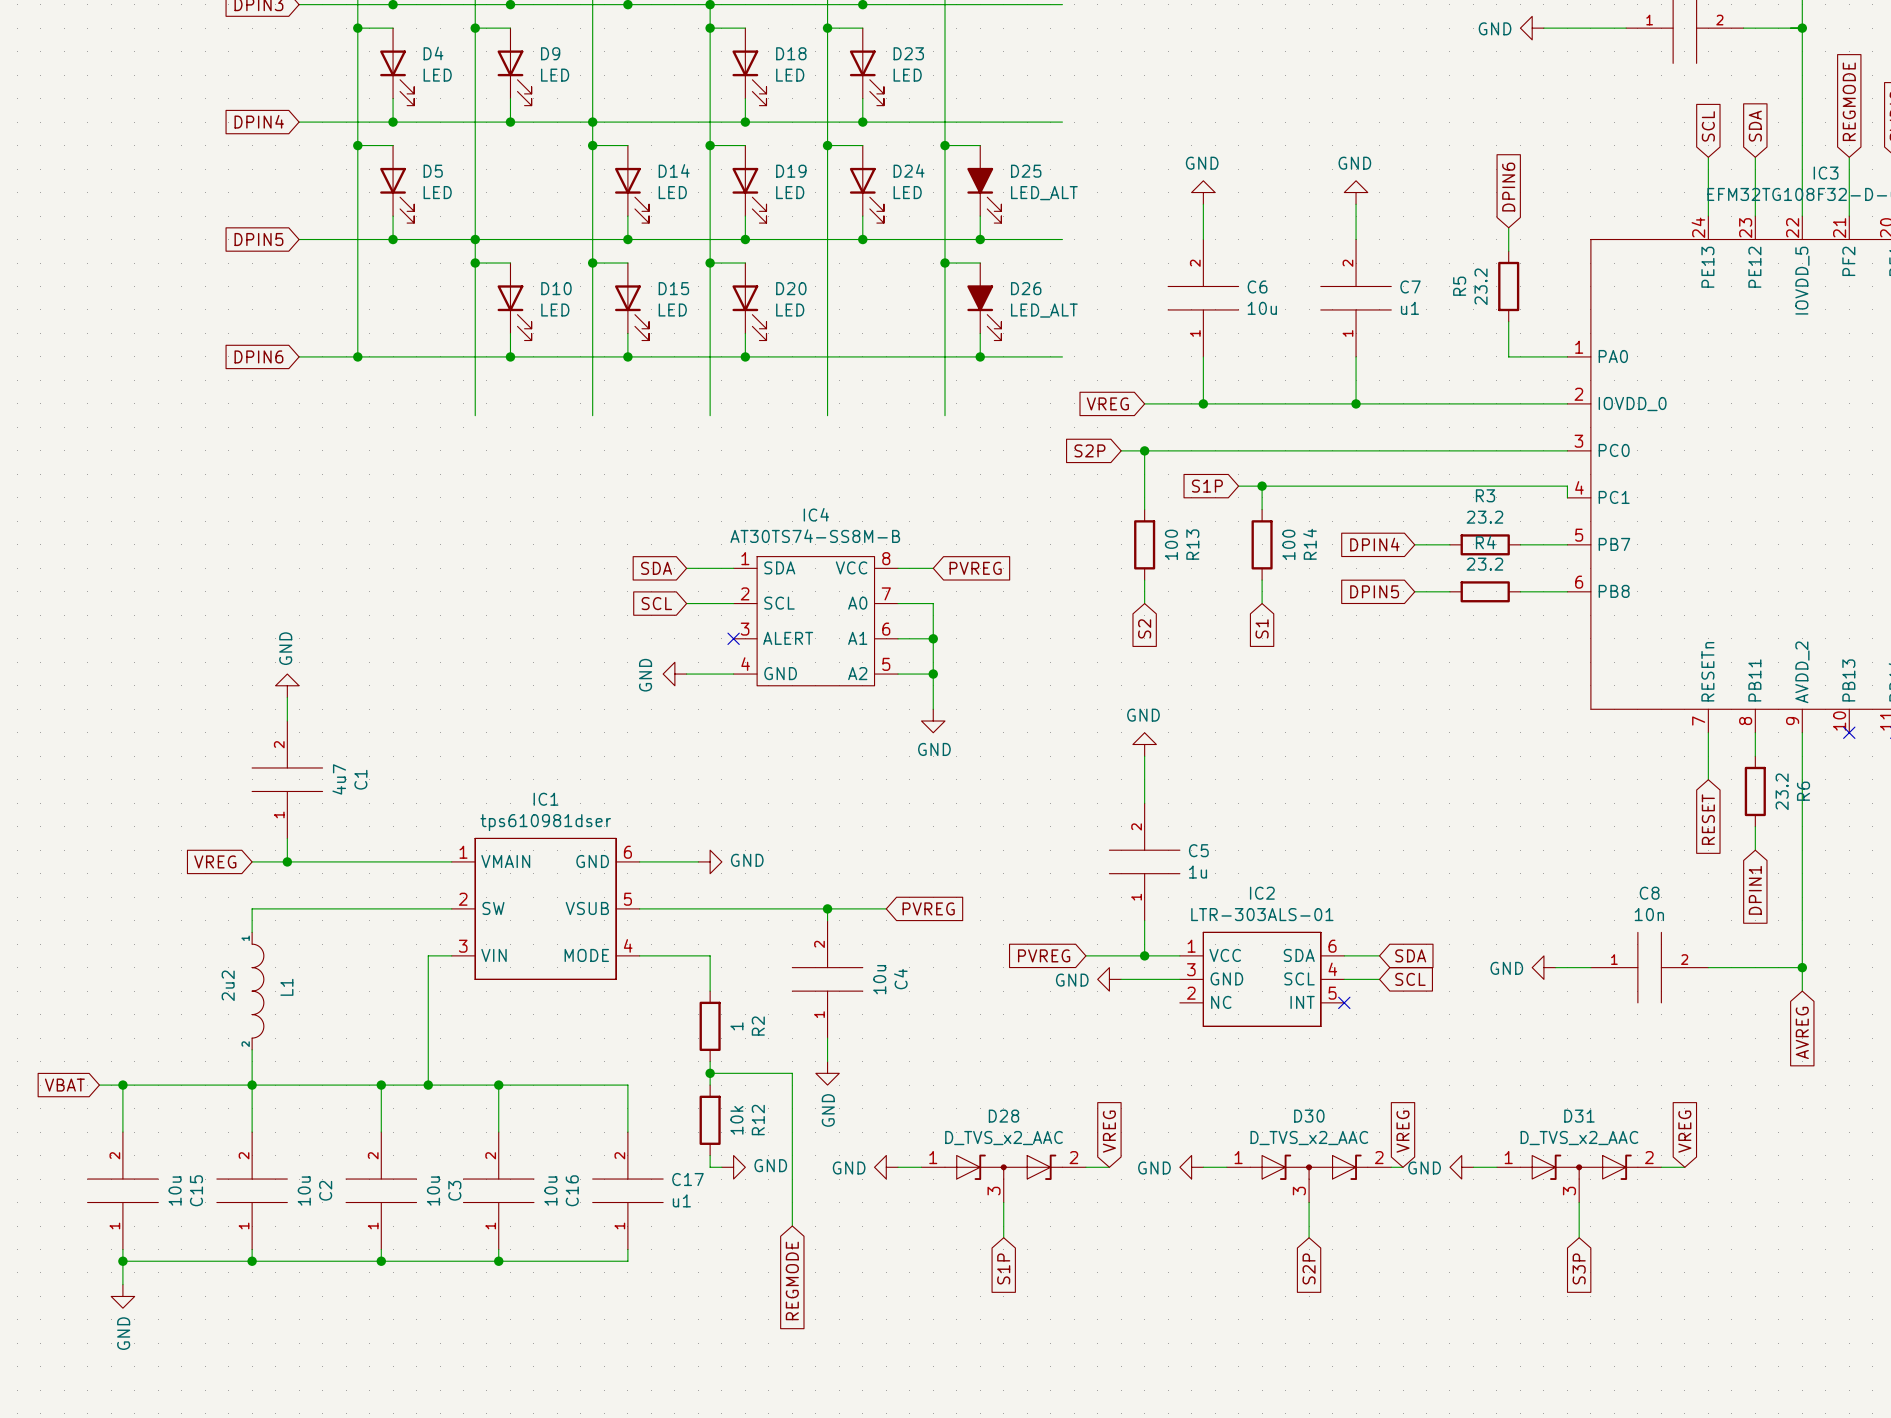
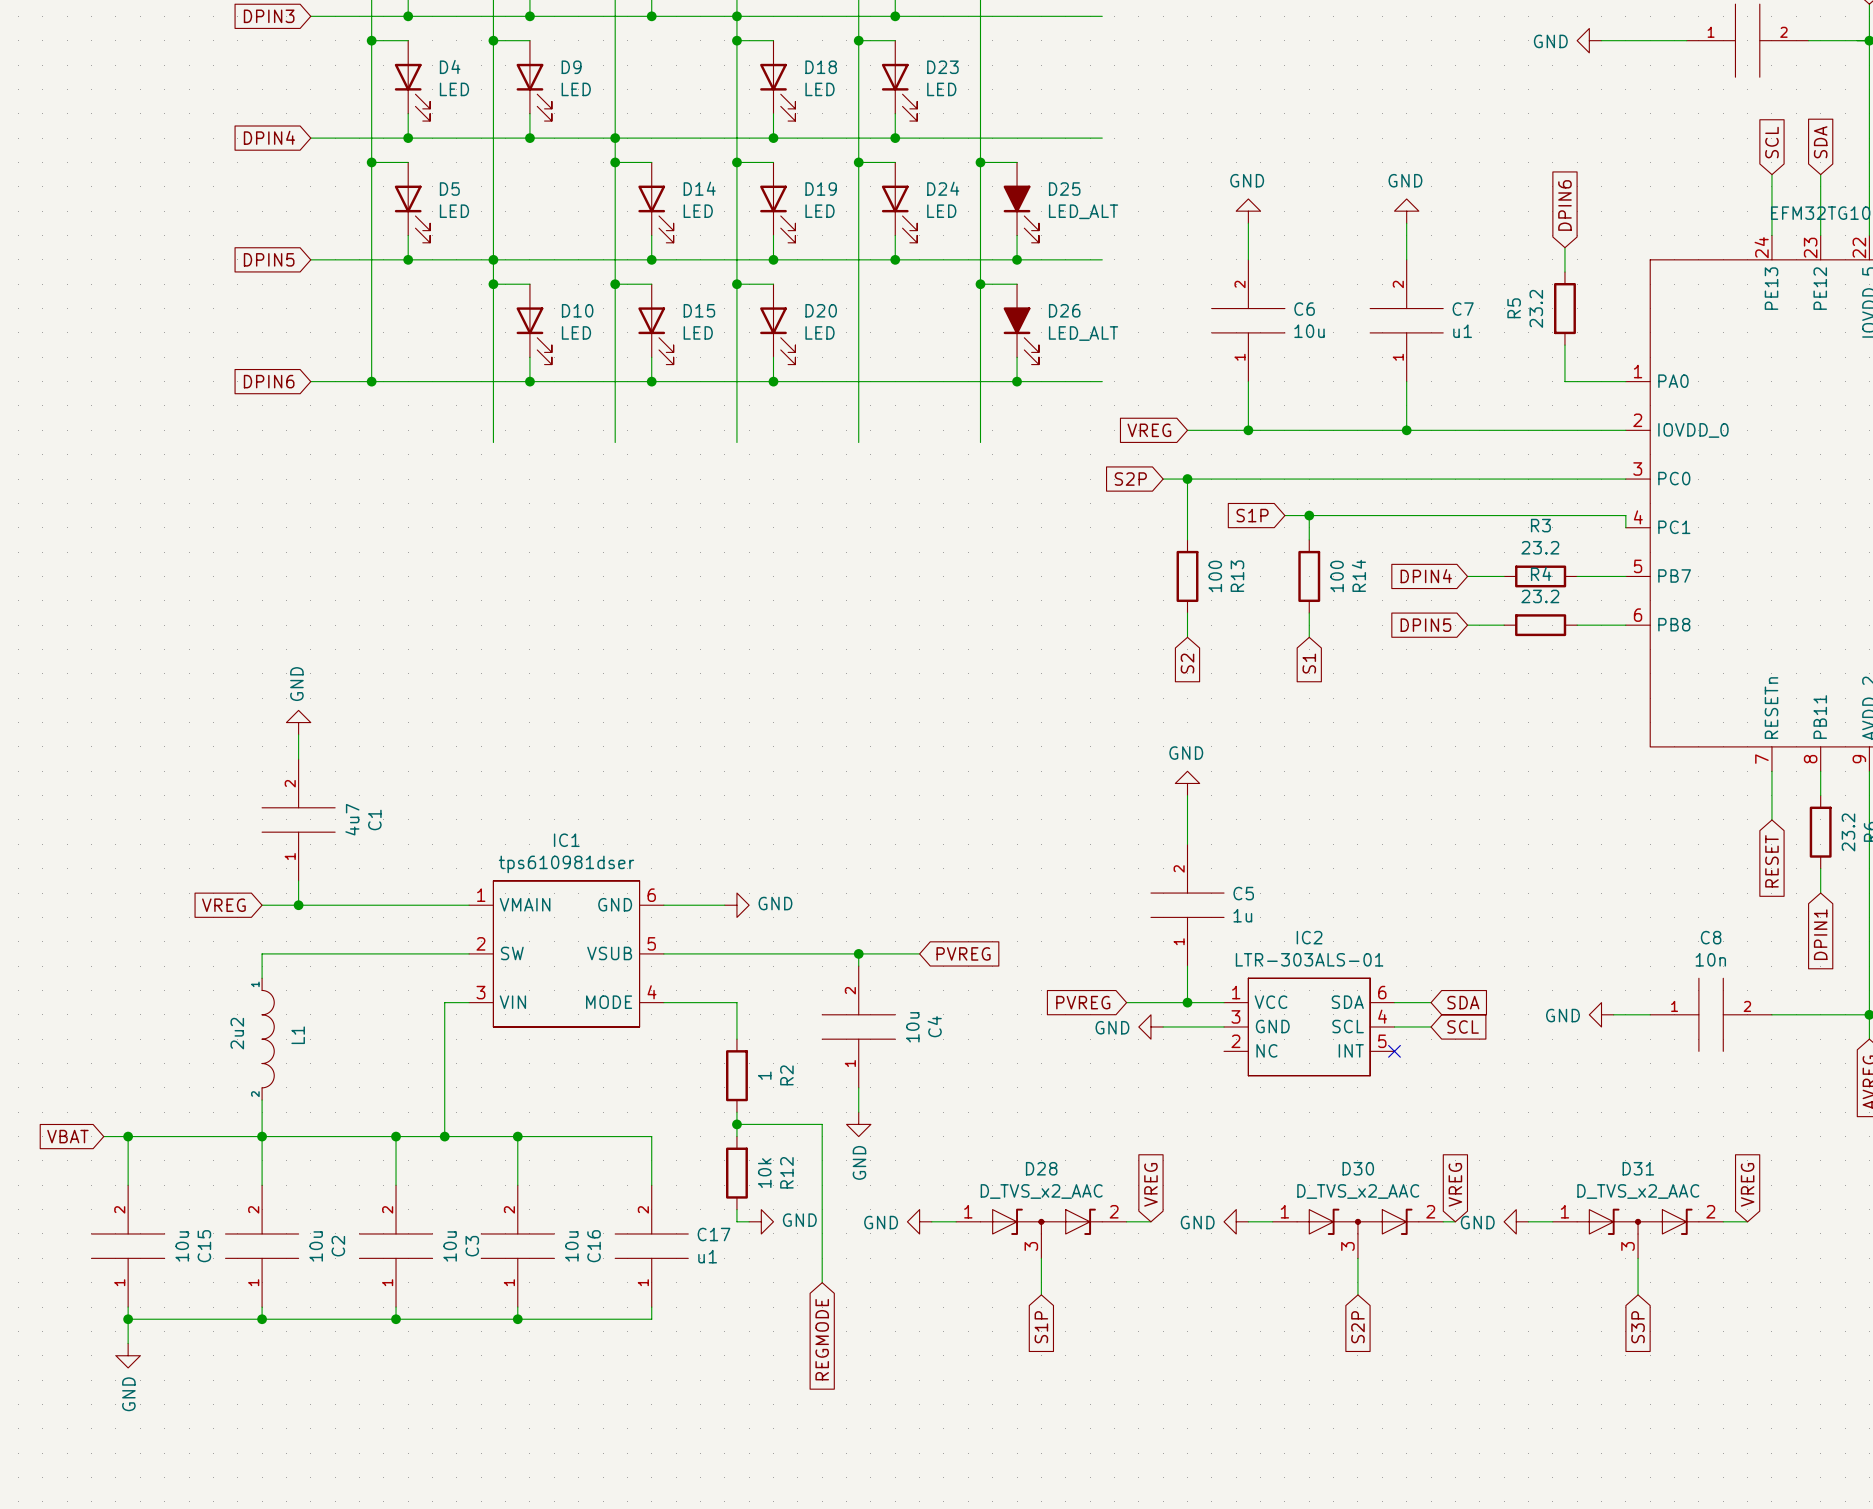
global label: SDA (656, 568) -> none
wire: (686, 568) (733, 568) -> none
wire: (898, 568) (933, 568) -> none
global label: PVREG (975, 568) -> none
global label: SCL (656, 603) -> none
wire: (686, 603) (733, 603) -> none
wire: (898, 603) (933, 603) (933, 709) -> none
IC4: AT30TS74-SS8M-B (815, 621) -> none
no-connect mark: (733, 638) -> none
wire: (898, 638) (933, 638) -> none
junction: (933, 638) -> none
power symbol: GND (674, 674) -> none
wire: (686, 674) (733, 674) -> none
wire: (898, 674) (933, 674) -> none
junction: (933, 674) -> none
power symbol: GND (933, 721) -> none

